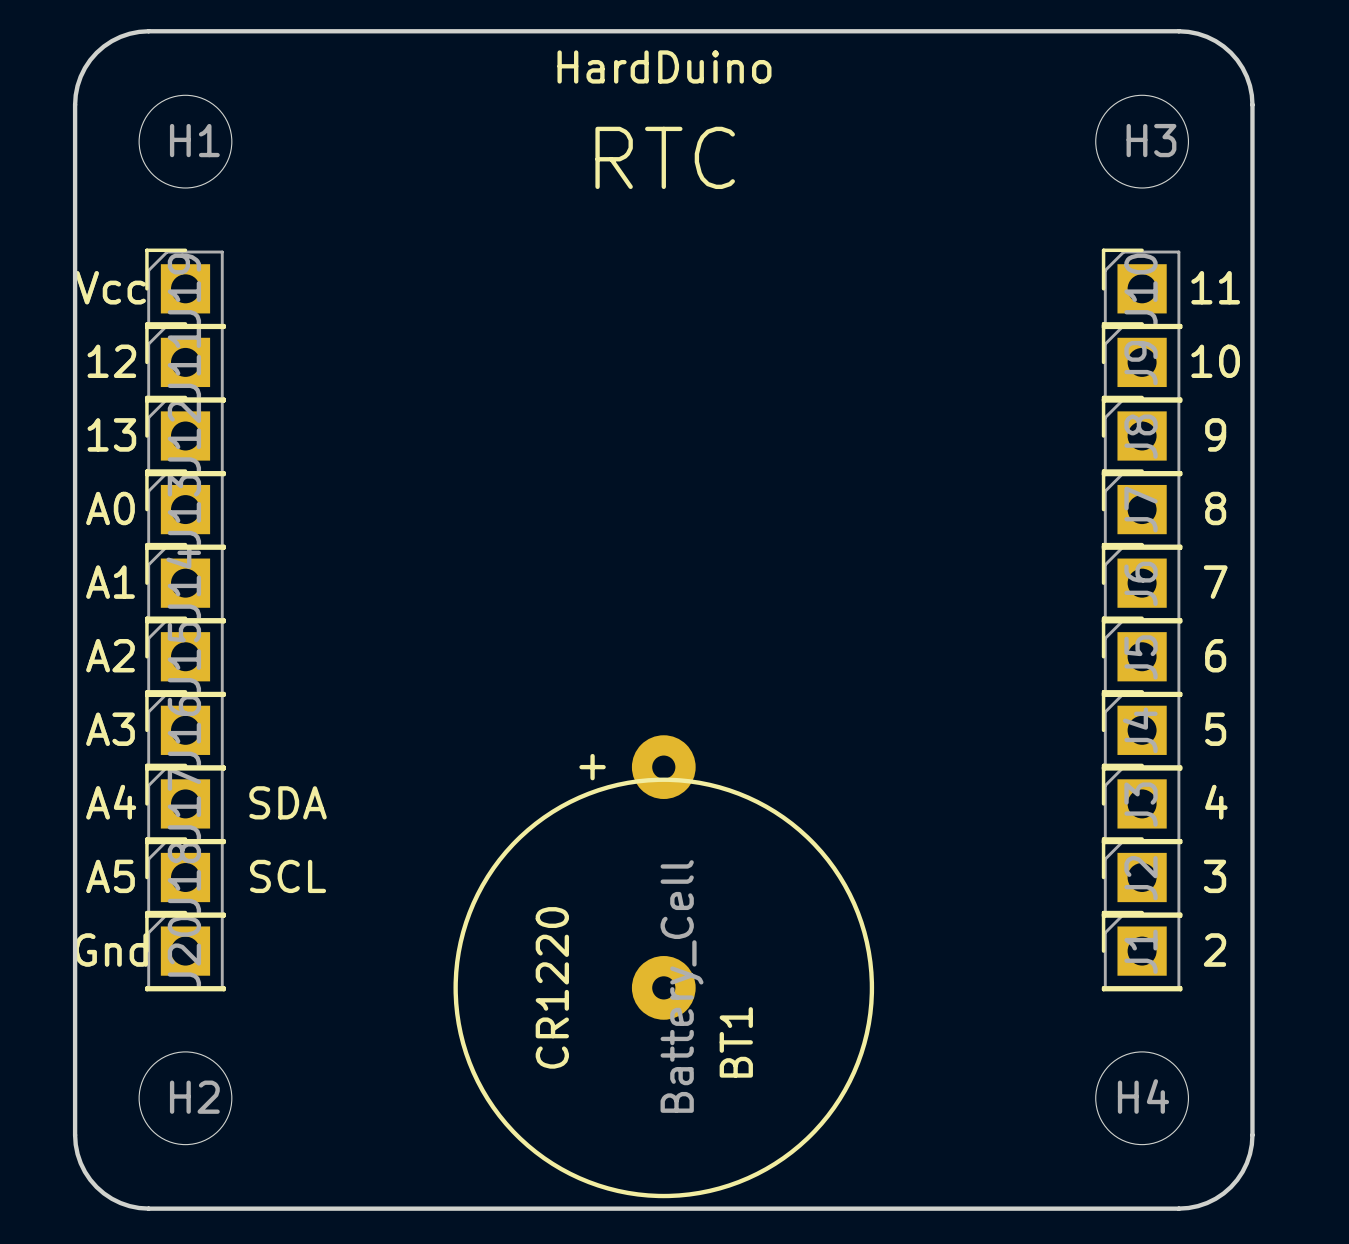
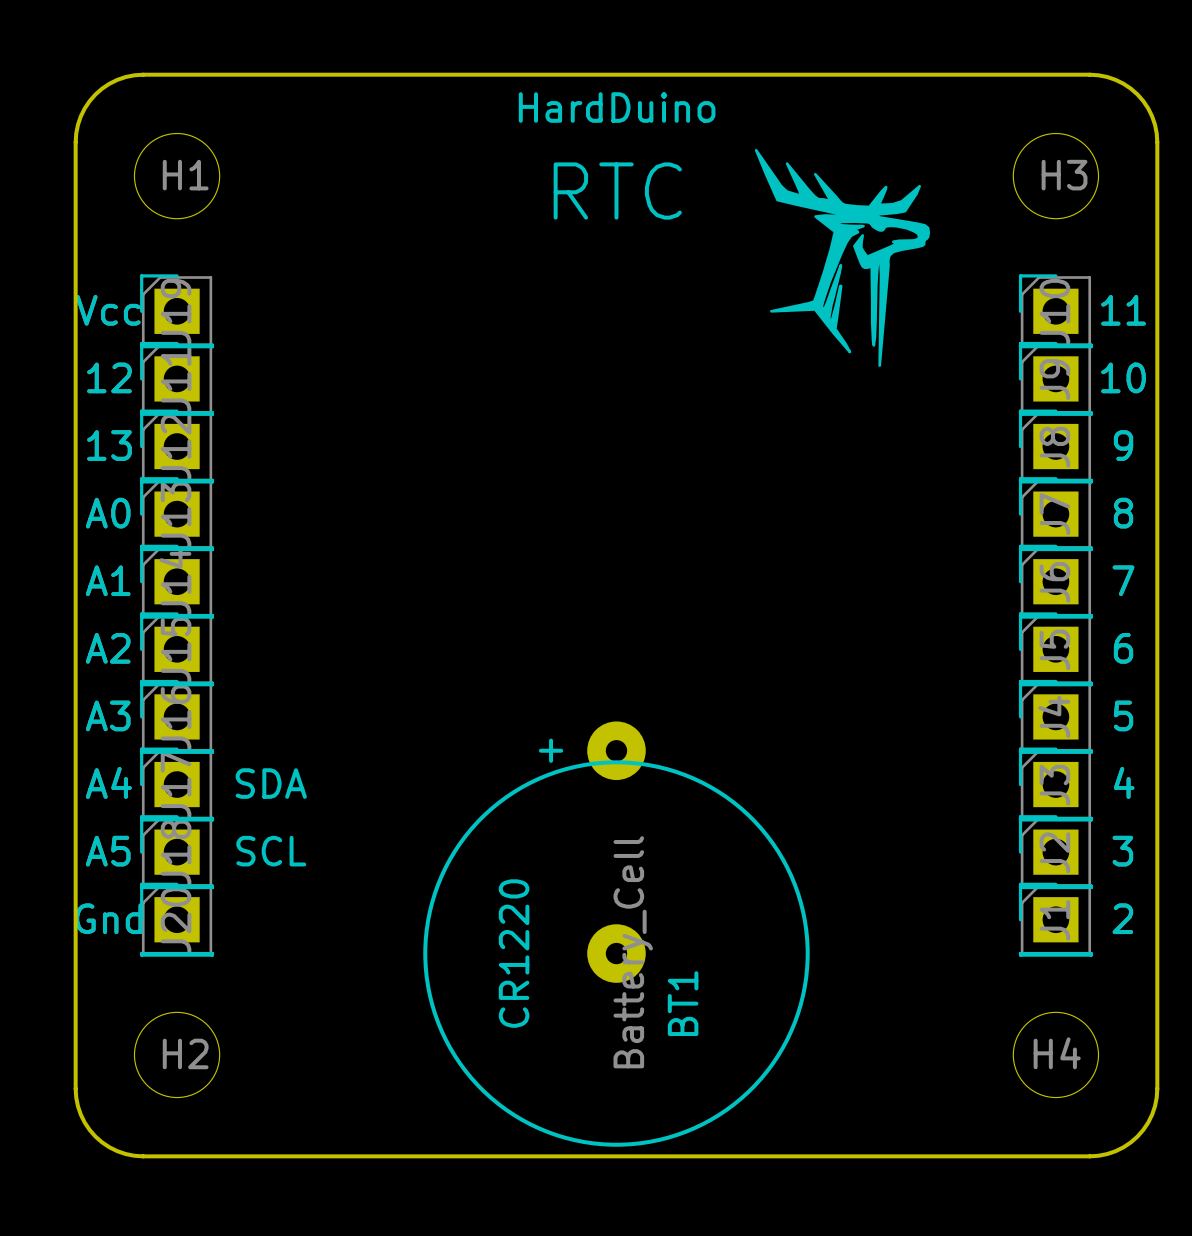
drawing: none -> [754, 148, 931, 367]

